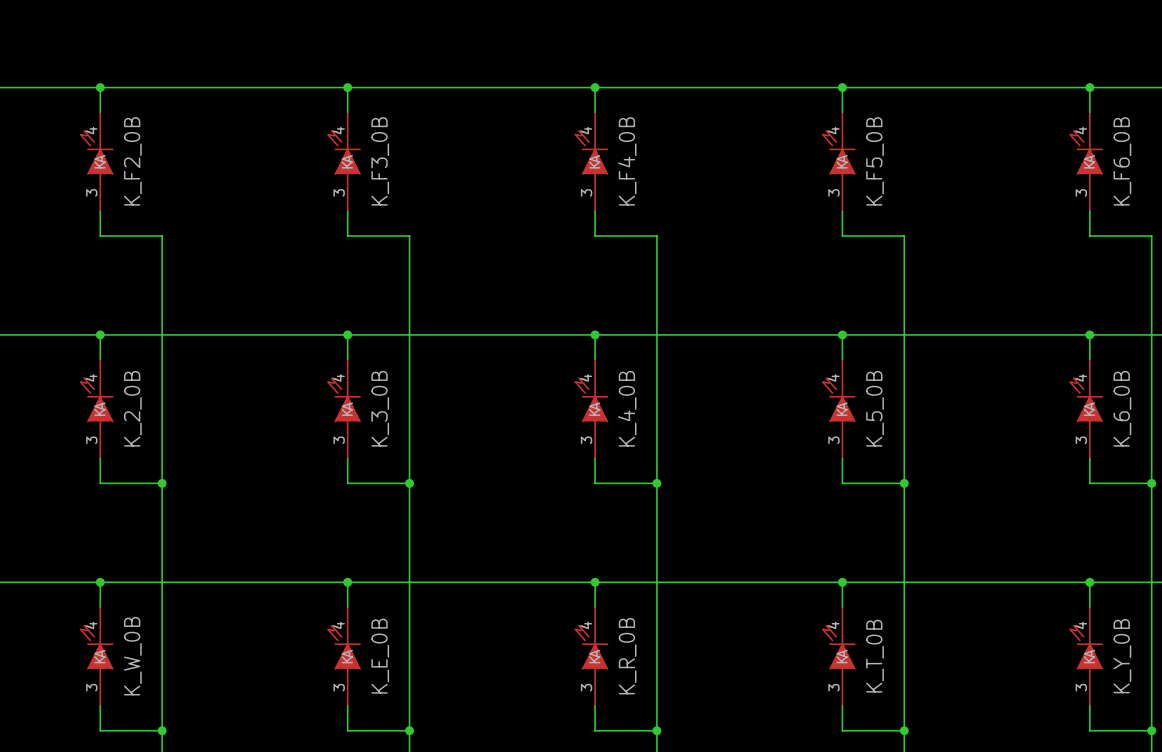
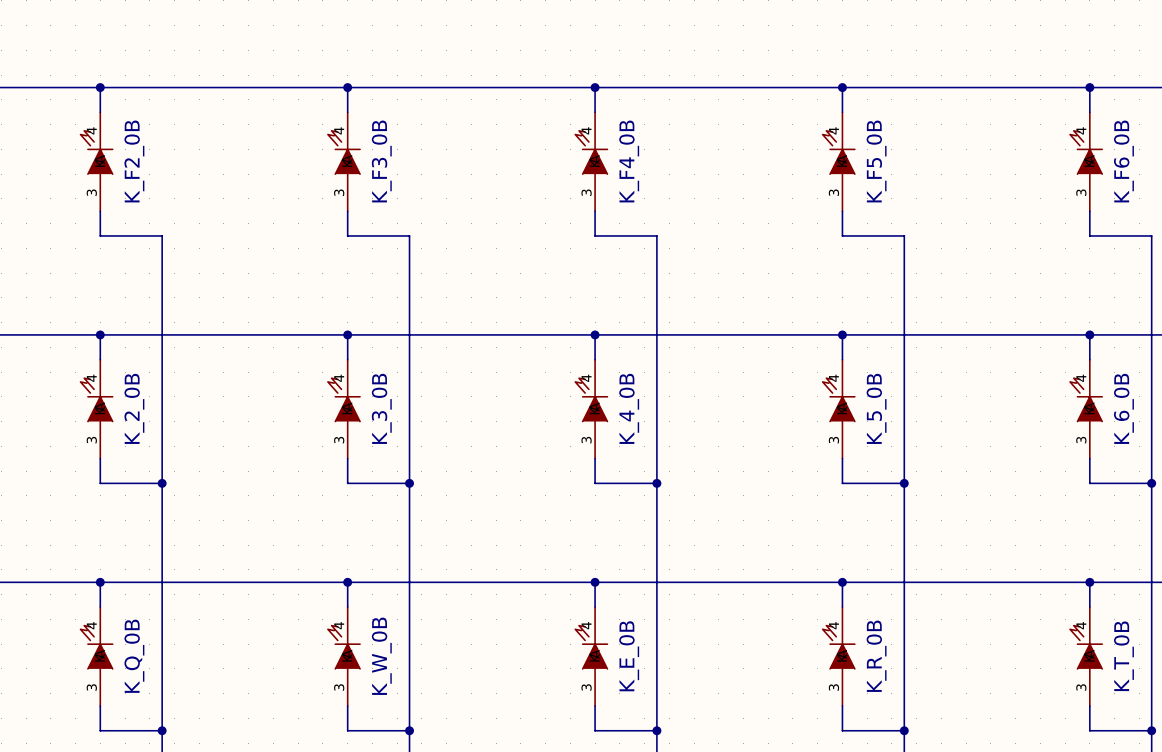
K_W_0B name: K_W_0B (132, 656) -> K_Q_0B (134, 656)
K_E_0B name: K_E_0B (380, 656) -> K_W_0B (381, 656)
K_R_0B name: K_R_0B (627, 656) -> K_E_0B (629, 656)
K_T_0B name: K_T_0B (875, 656) -> K_R_0B (876, 656)
K_Y_0B name: K_Y_0B (1122, 656) -> K_T_0B (1123, 656)

